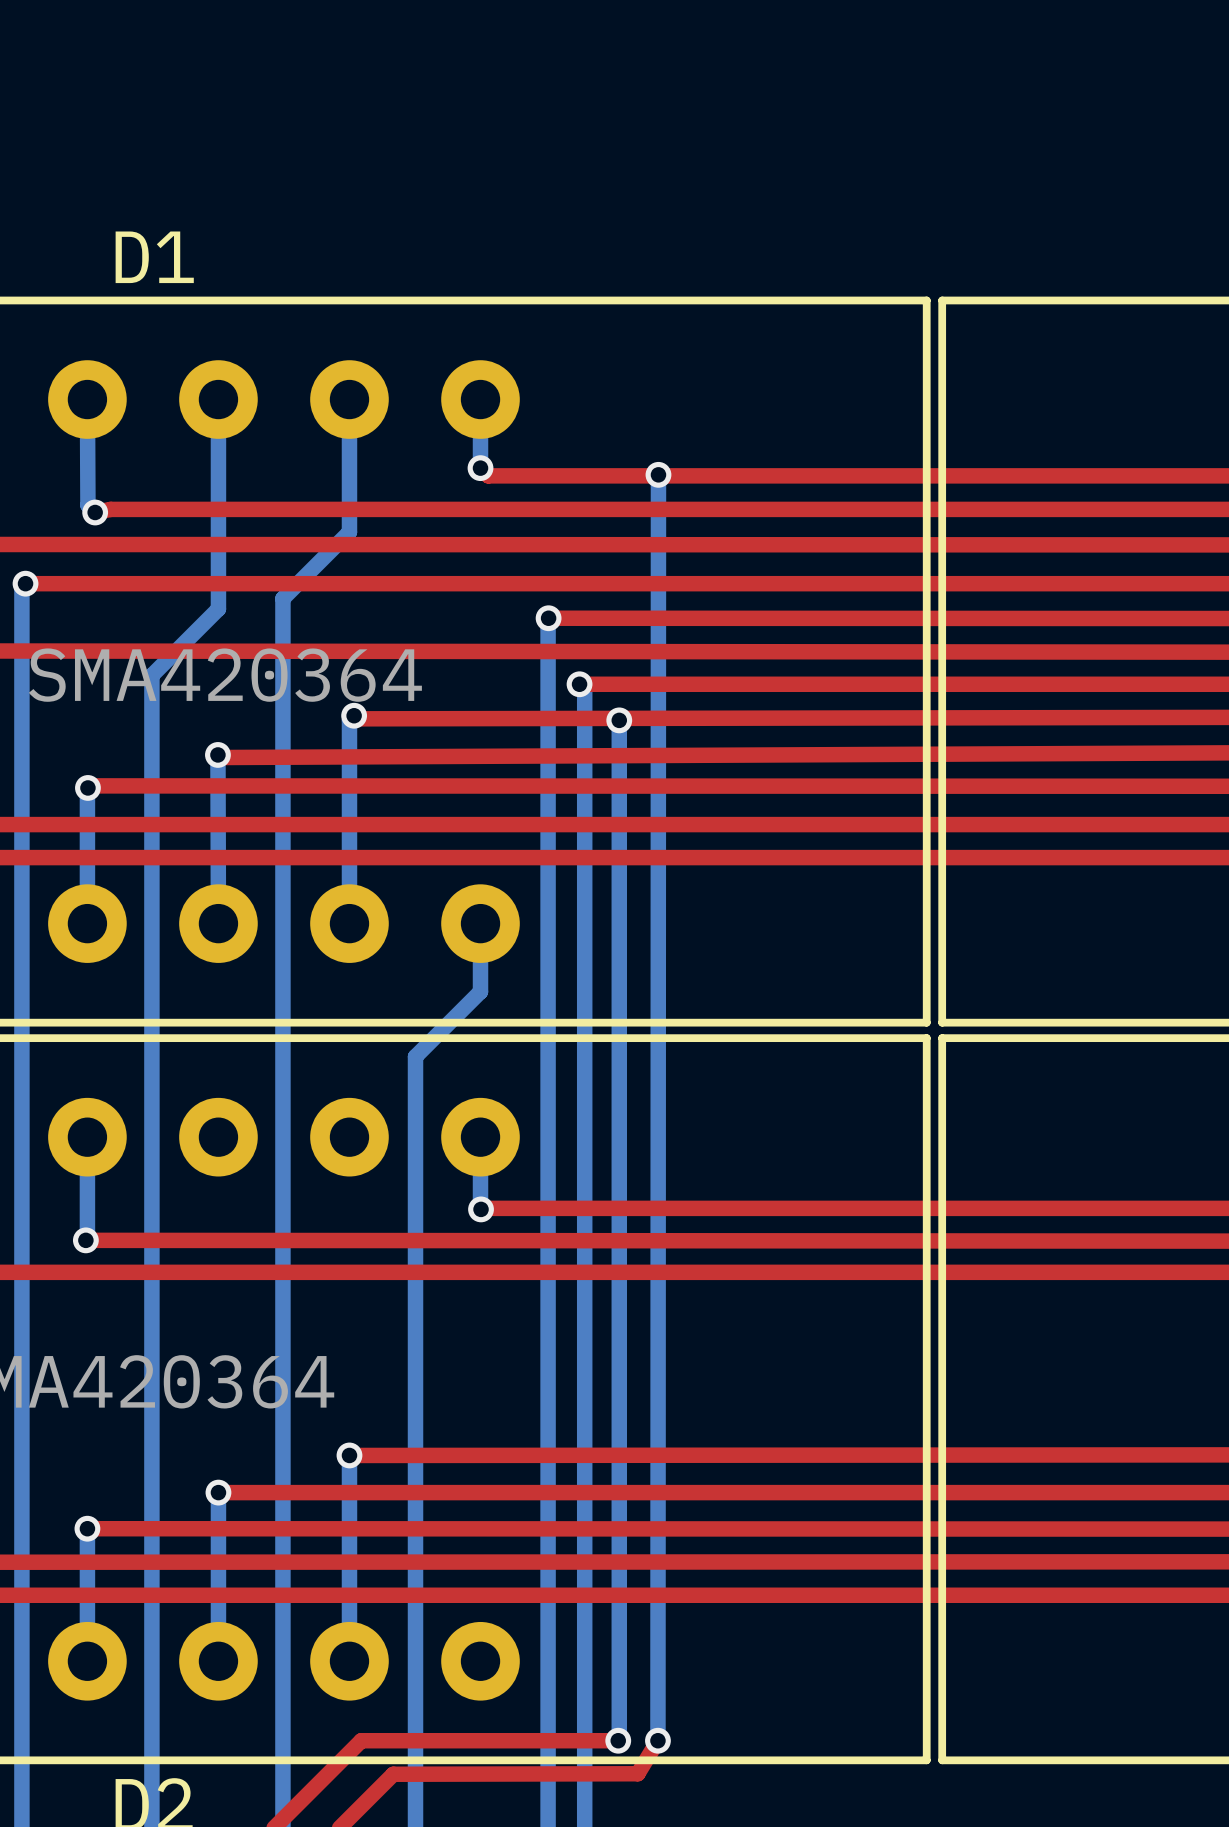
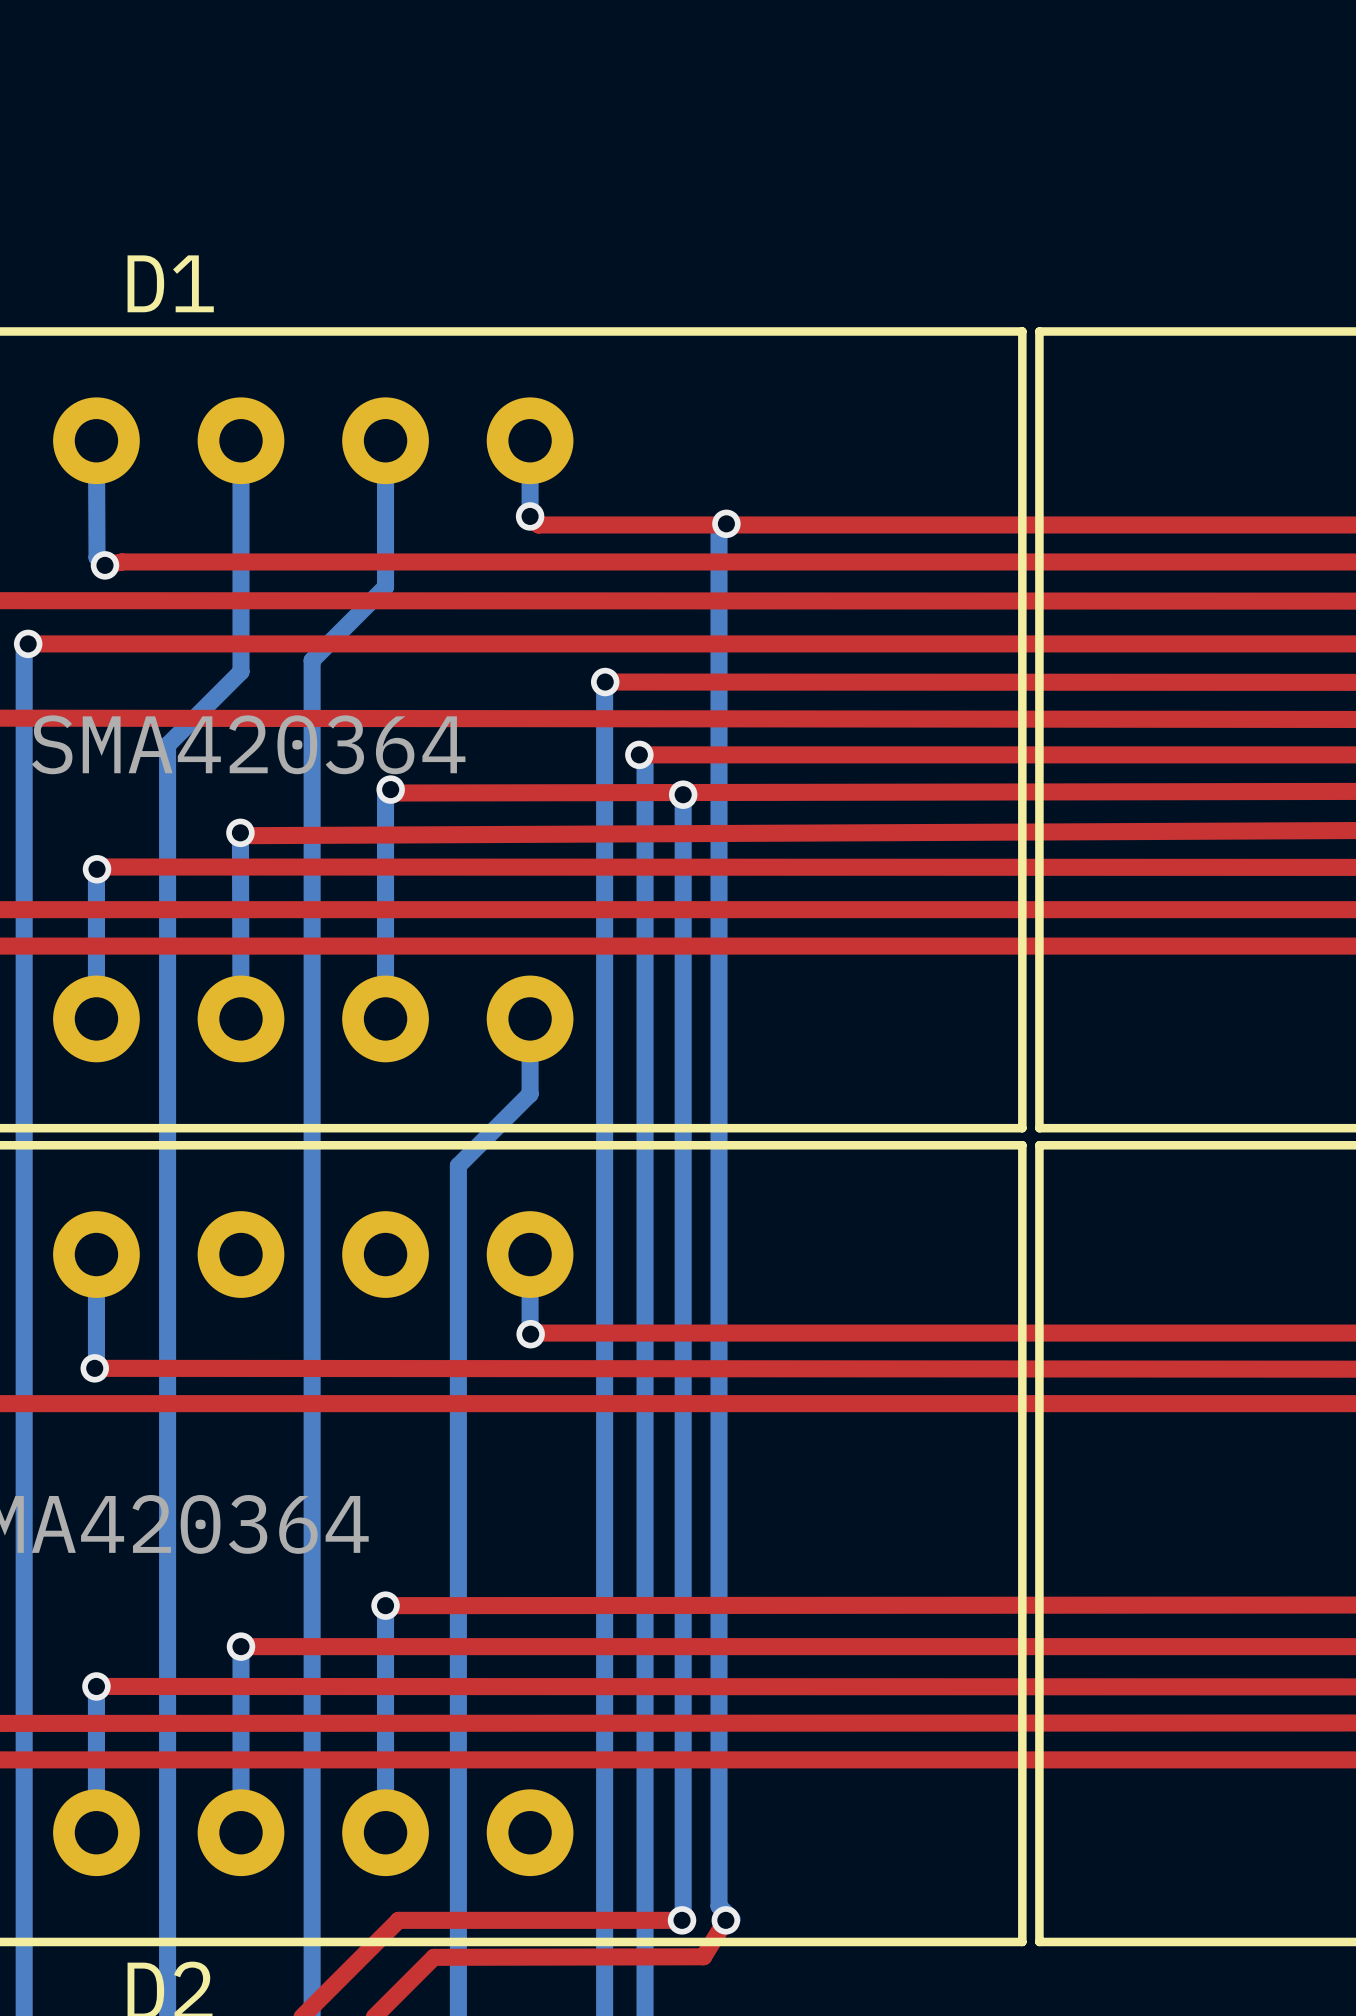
bottom track: none -> (719, 523) (719, 1906) (732, 1919)
bottom track: (658, 474) (657, 1740) -> none

